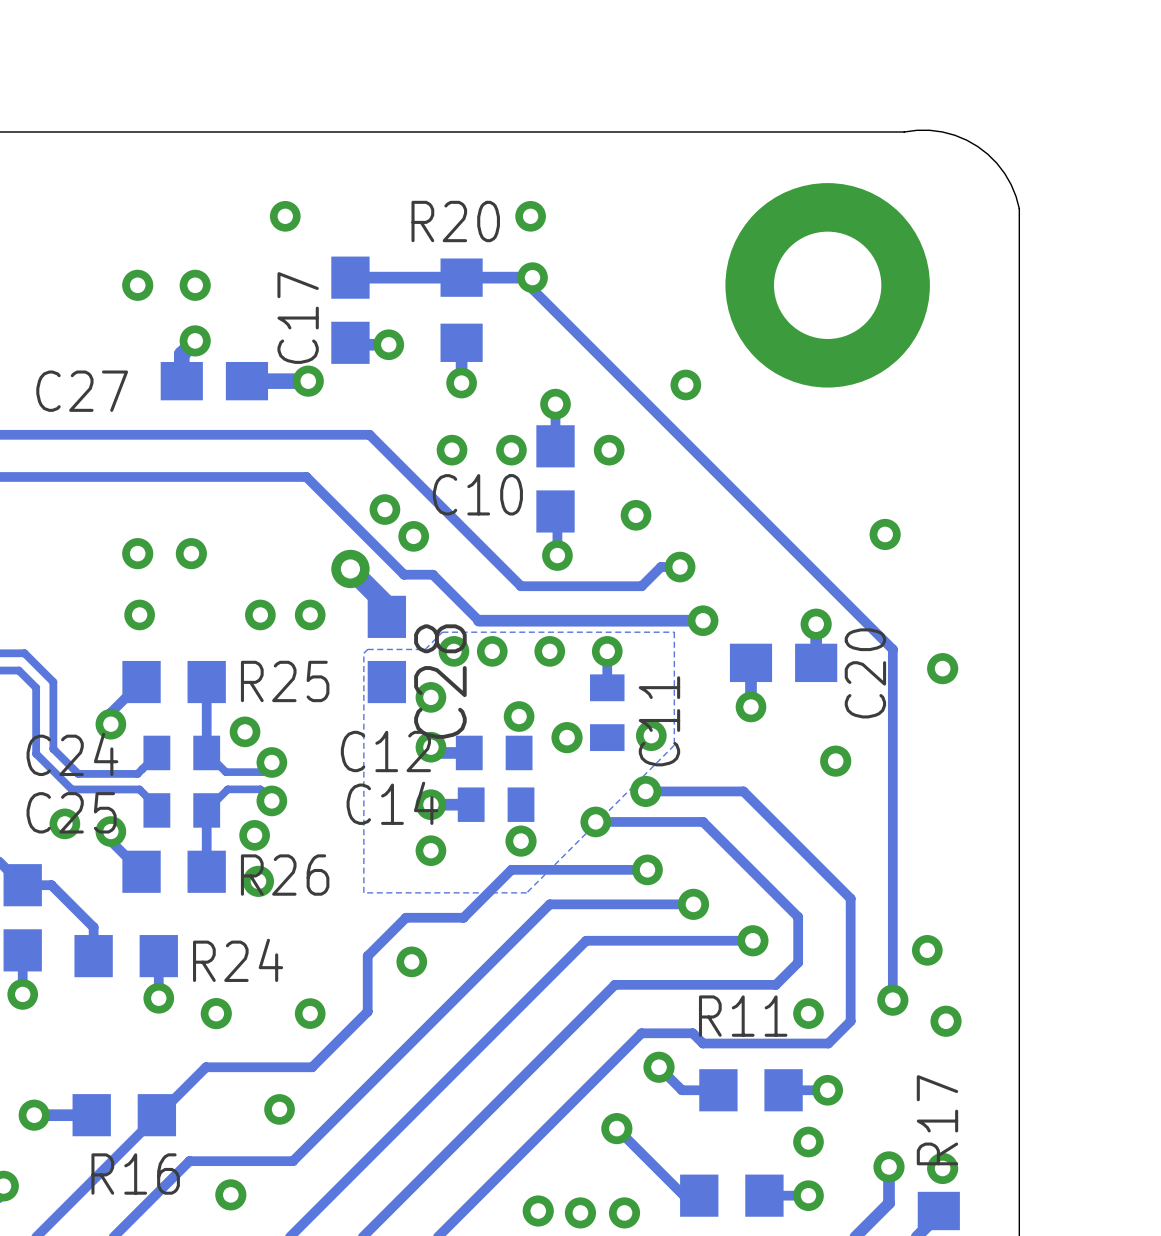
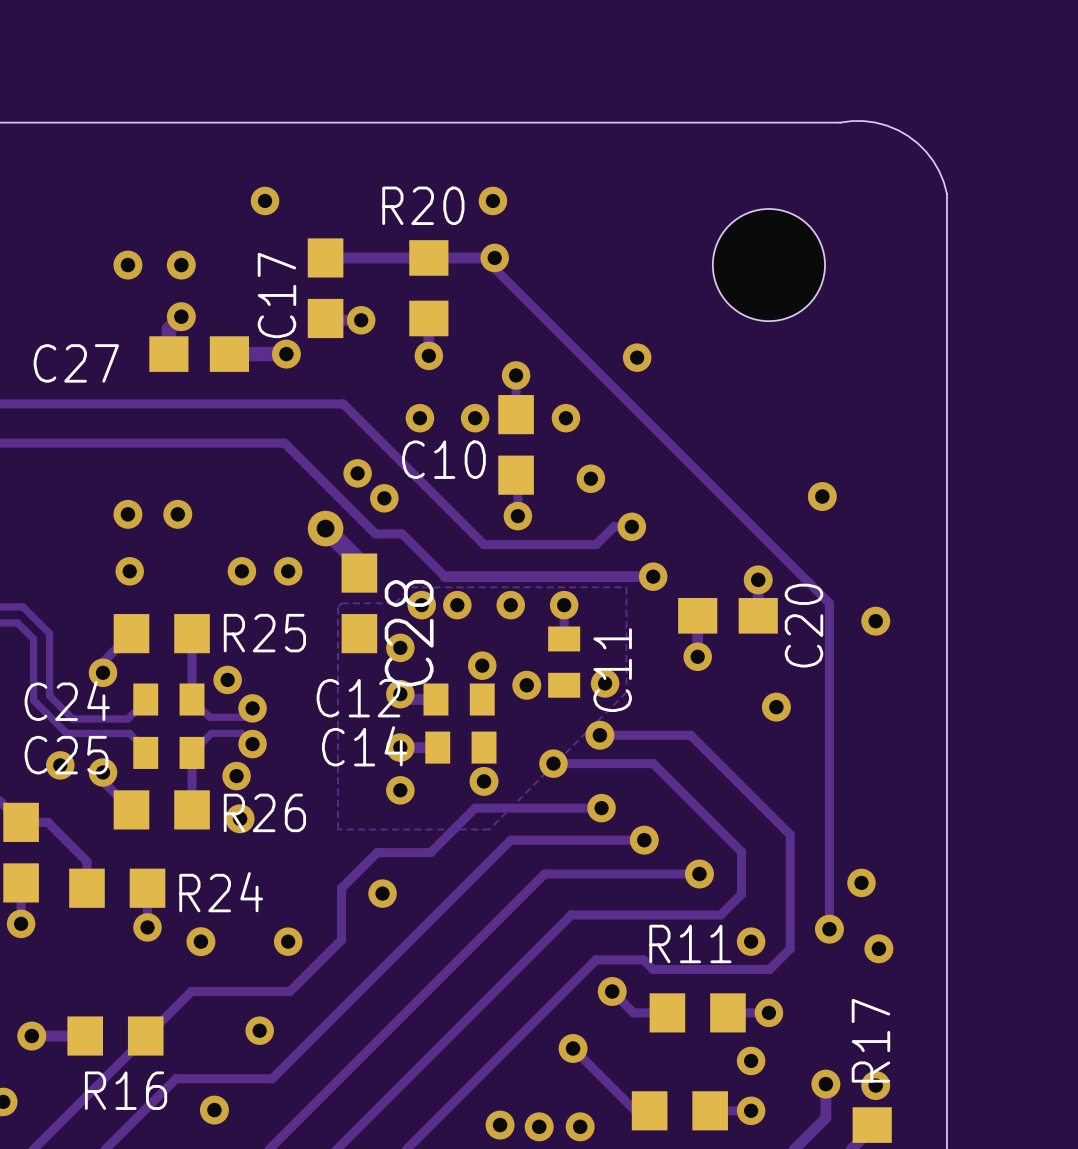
part: (827, 285) -> none
hole: none -> (768, 265)

